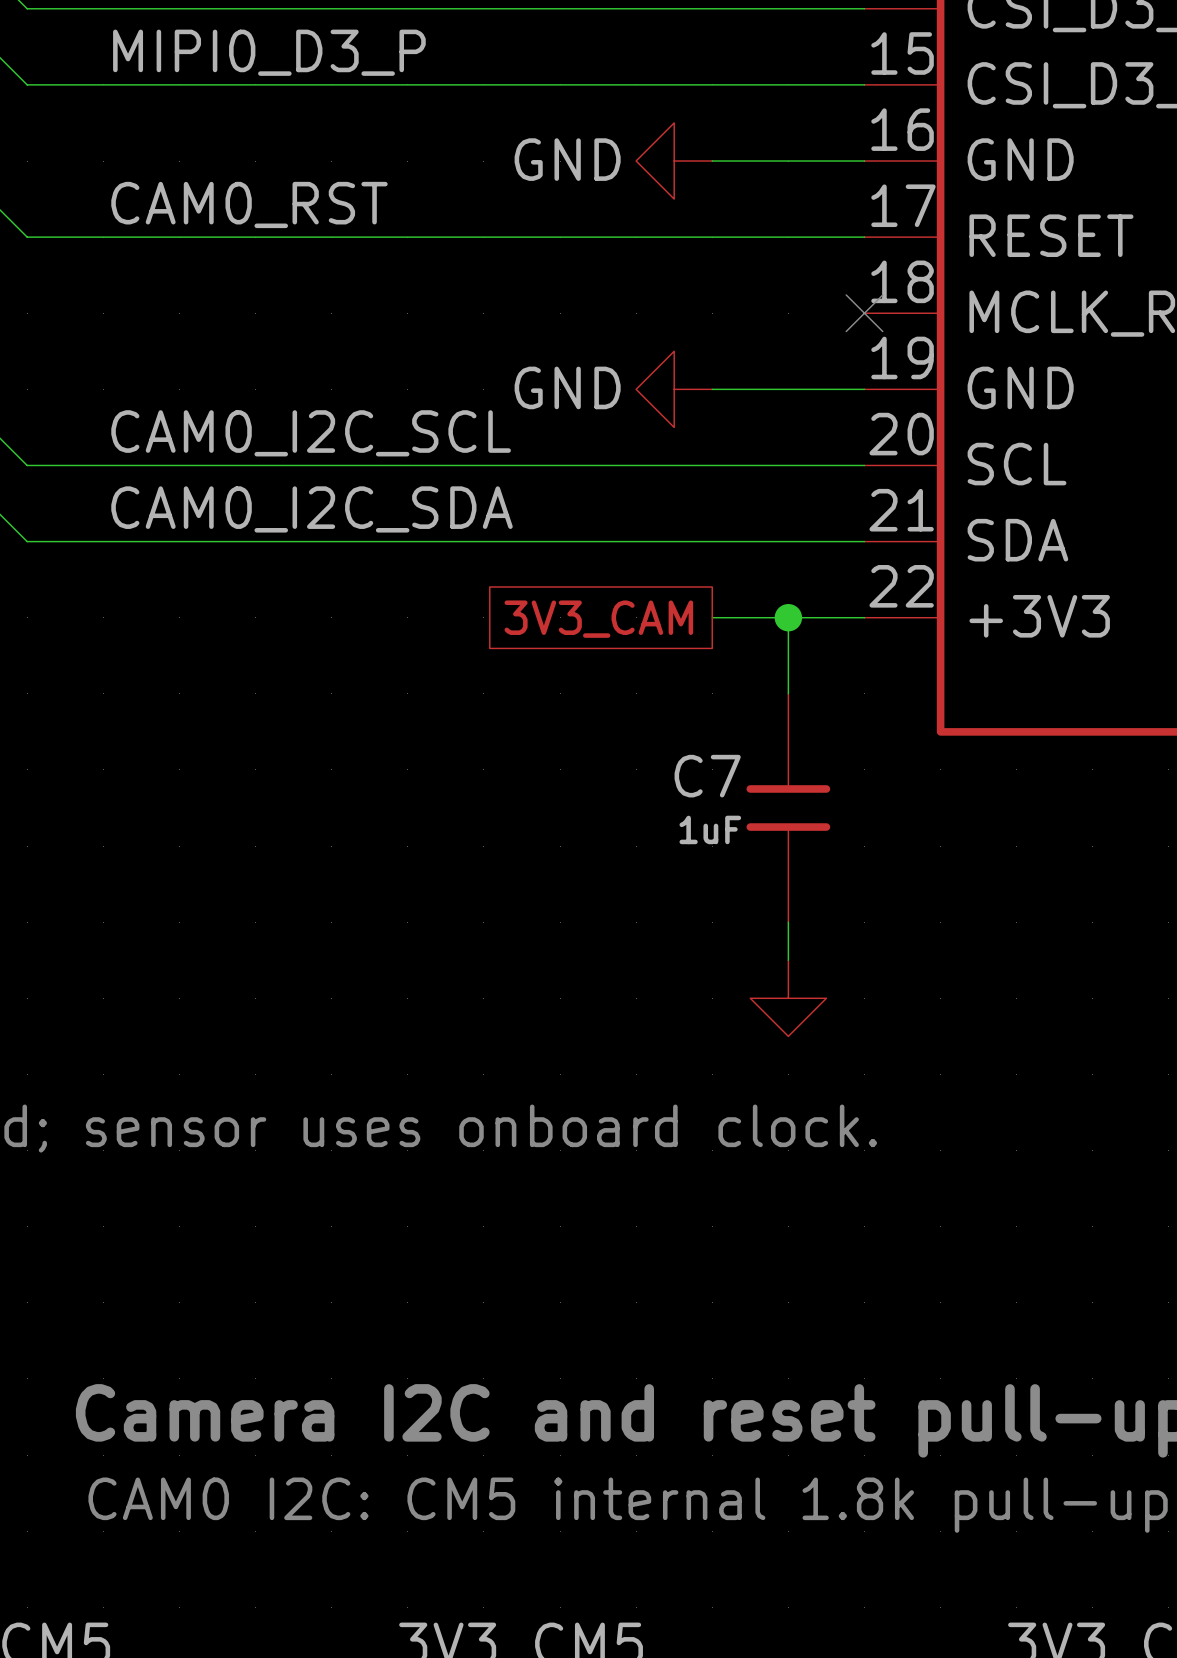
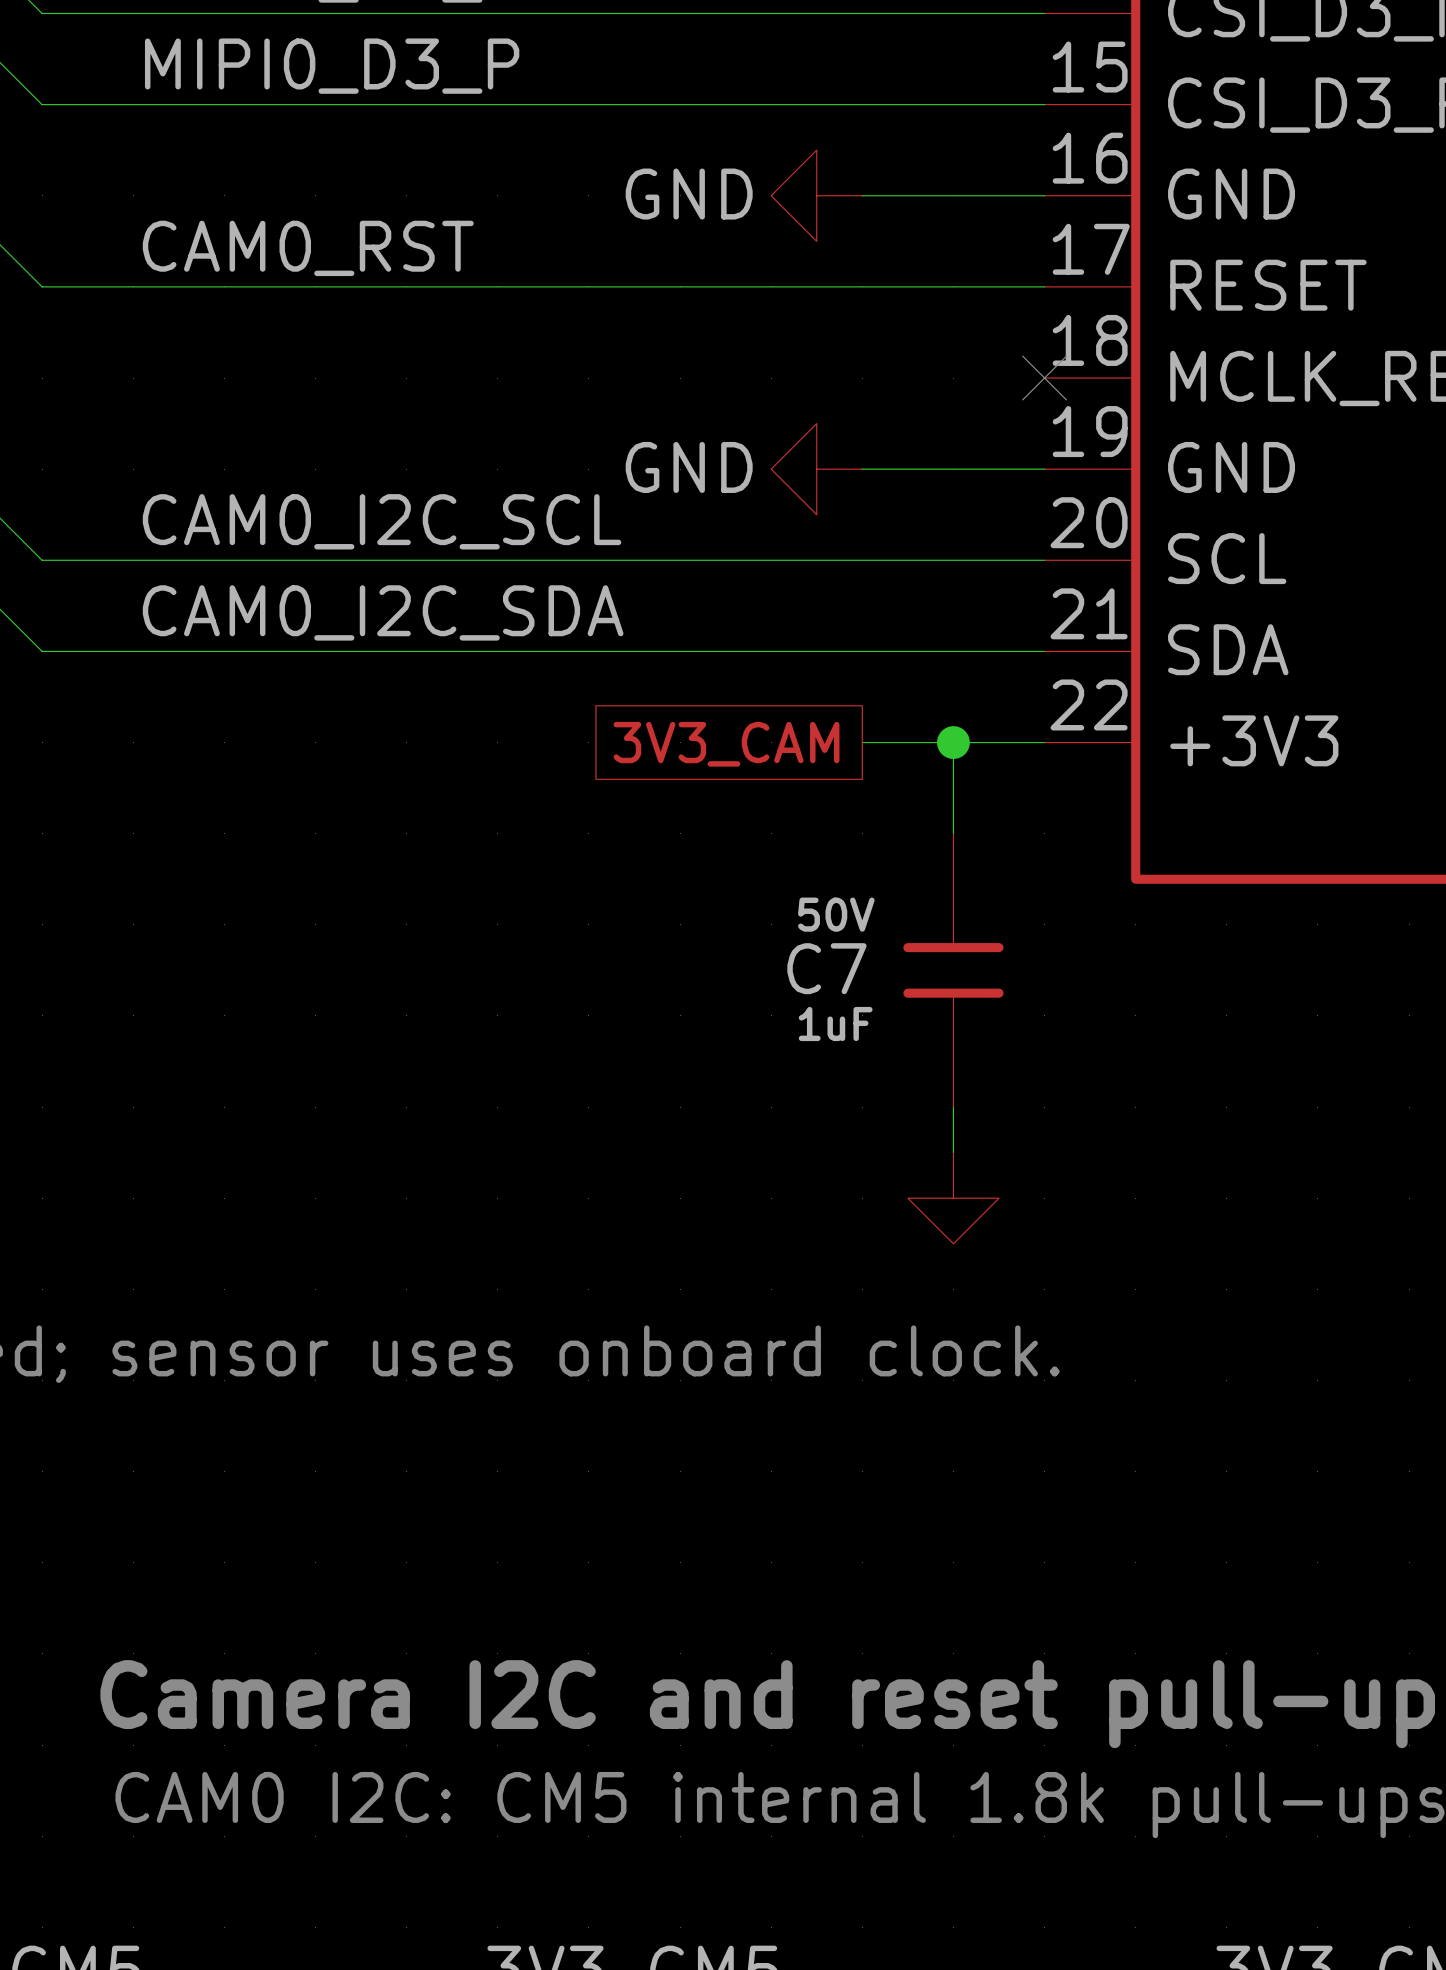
C7 text: none -> 50V (836, 914)
C7 name position: C7 (707, 776) -> C7 (826, 968)
C7 value position: 1uF (710, 829) -> 1uF (835, 1024)

